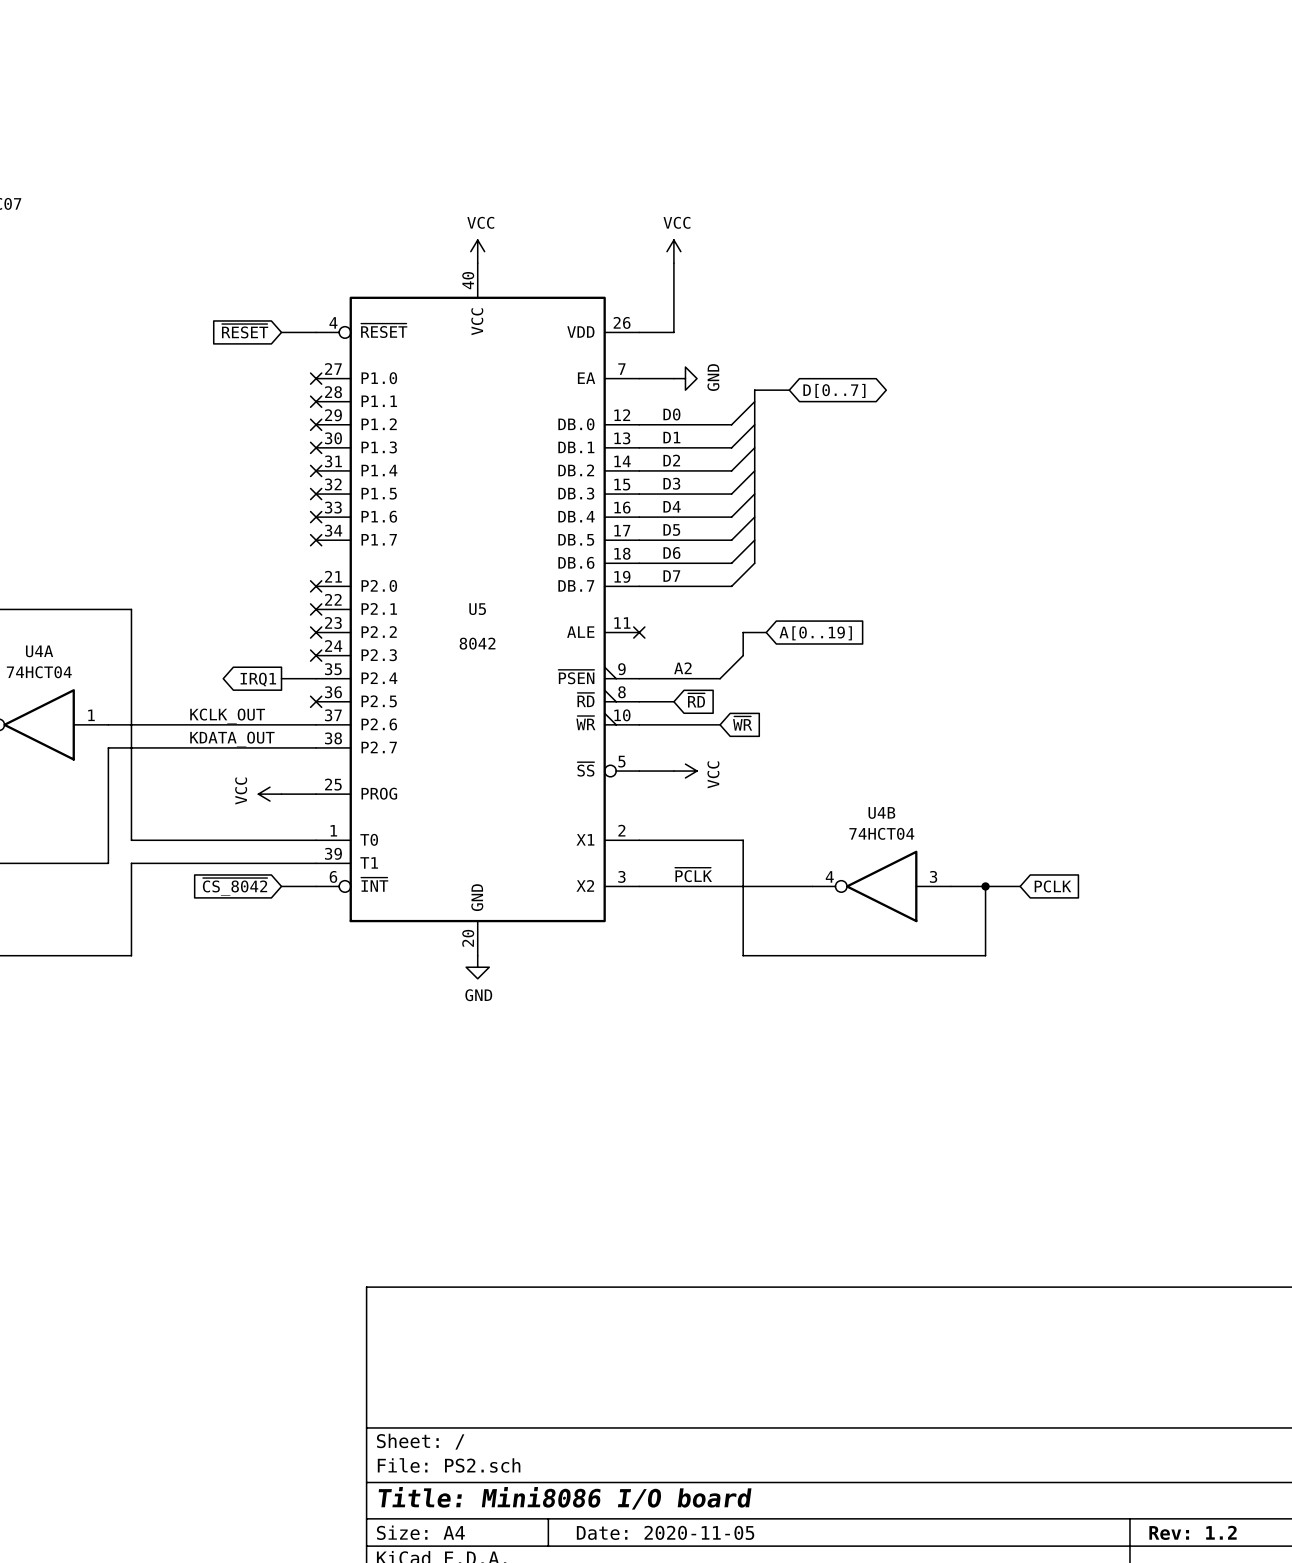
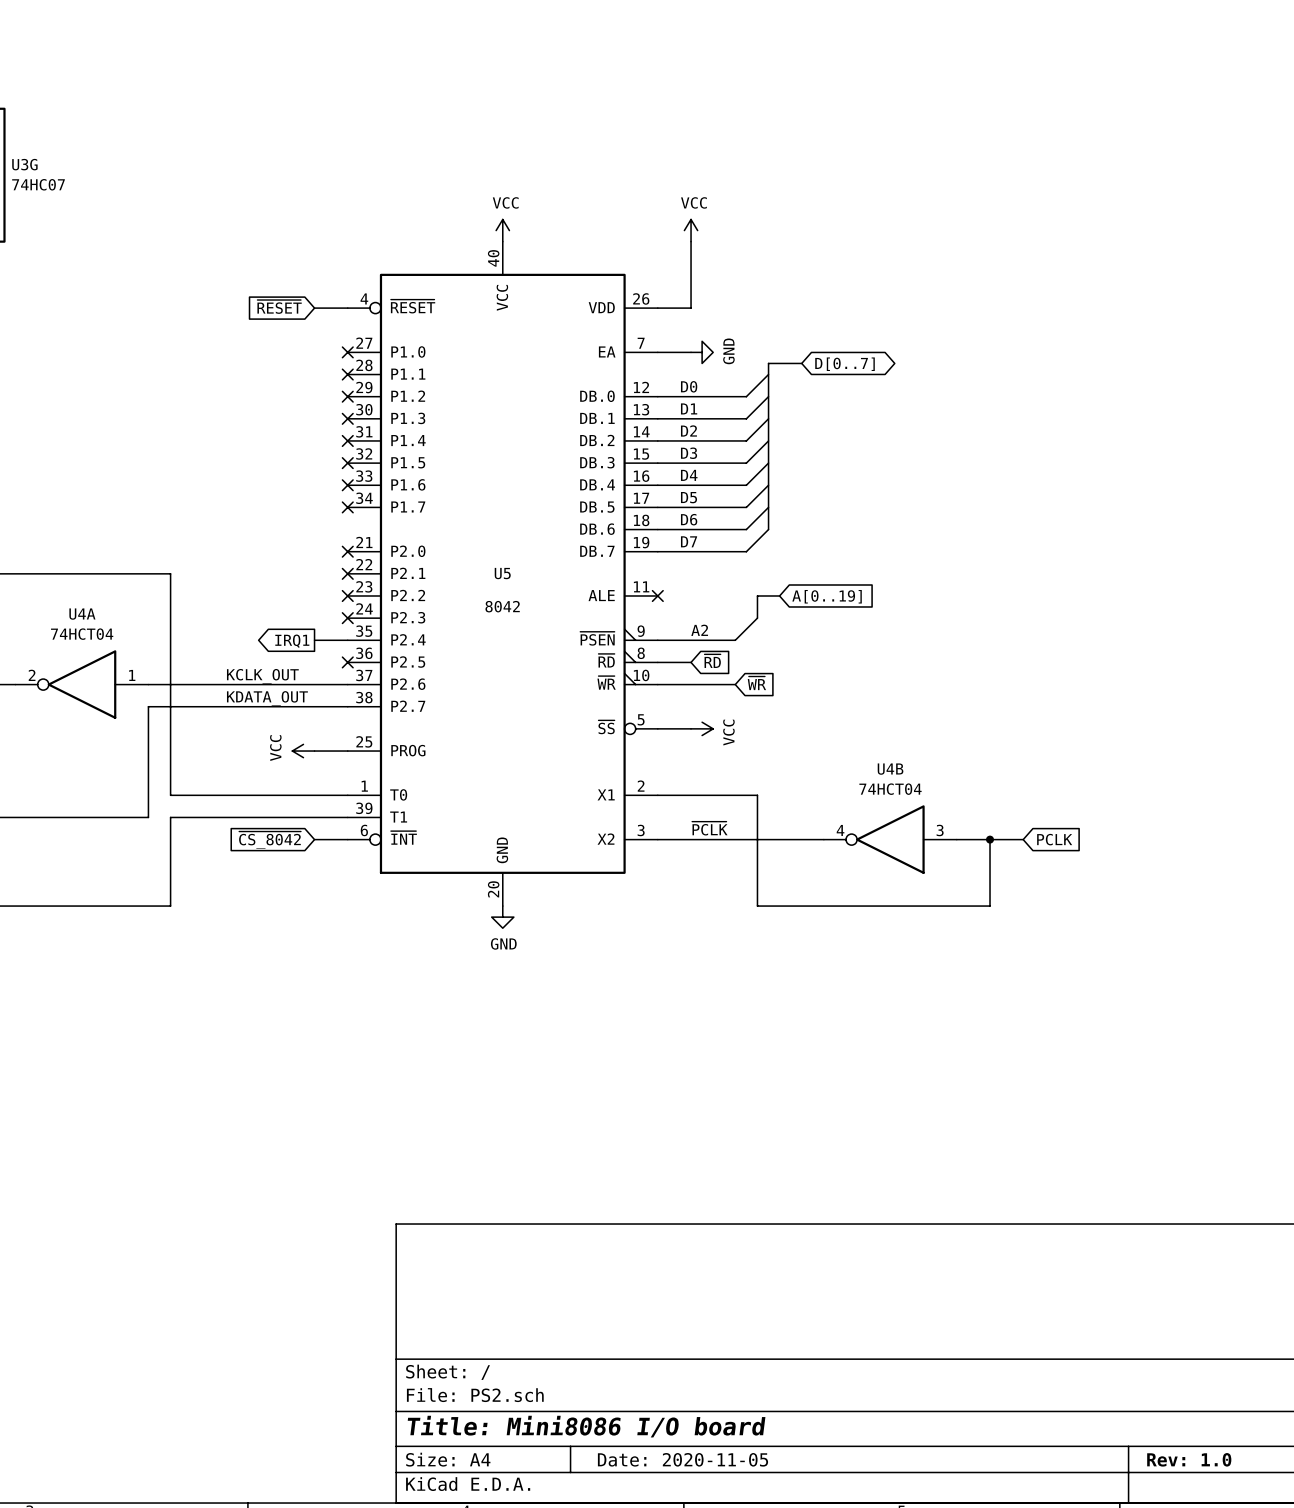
title block: Rev: 1.2 (1193, 1532) -> Rev: 1.0 (1189, 1459)

